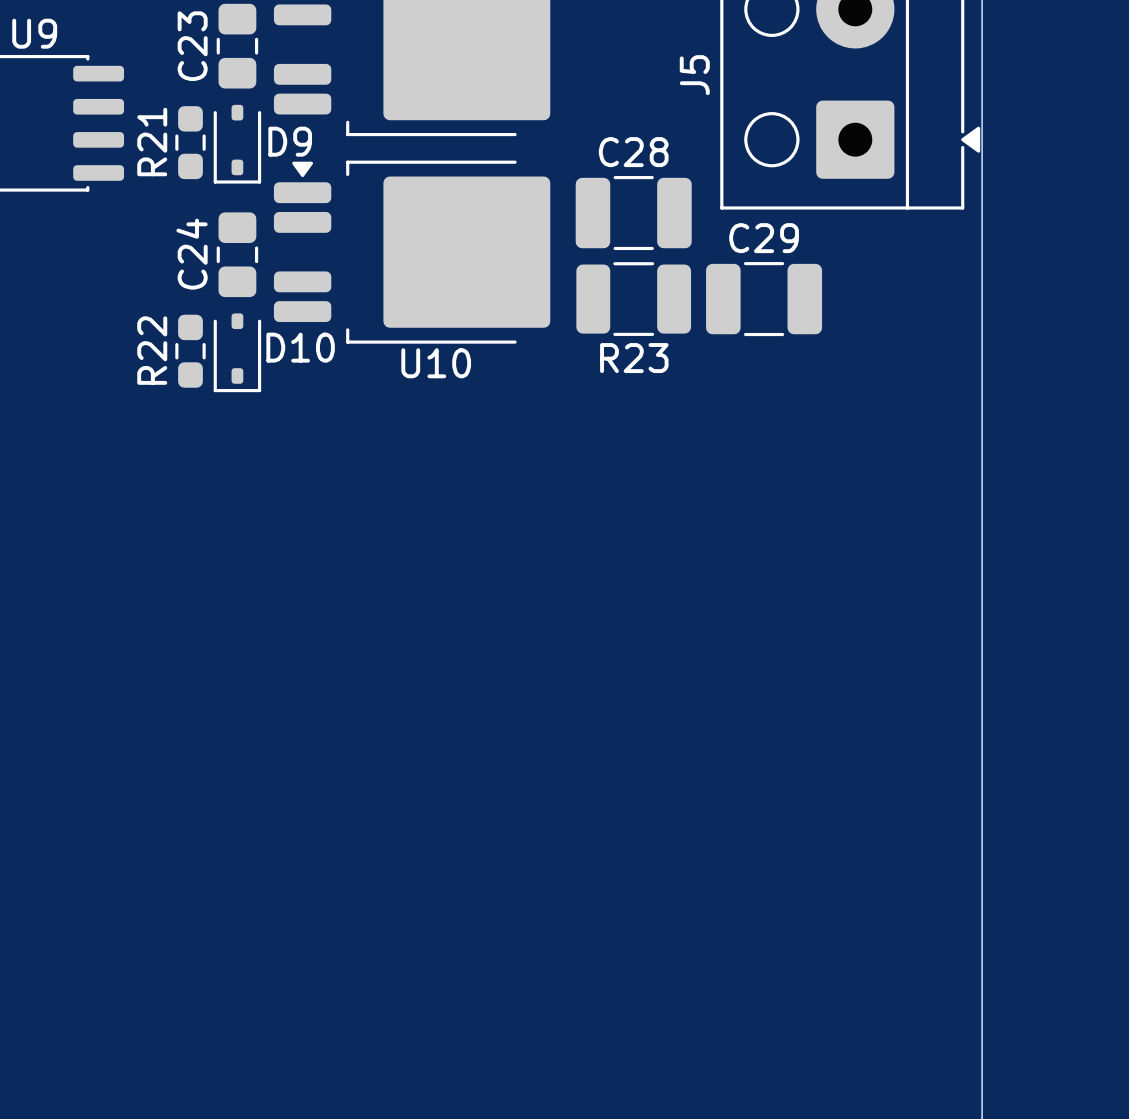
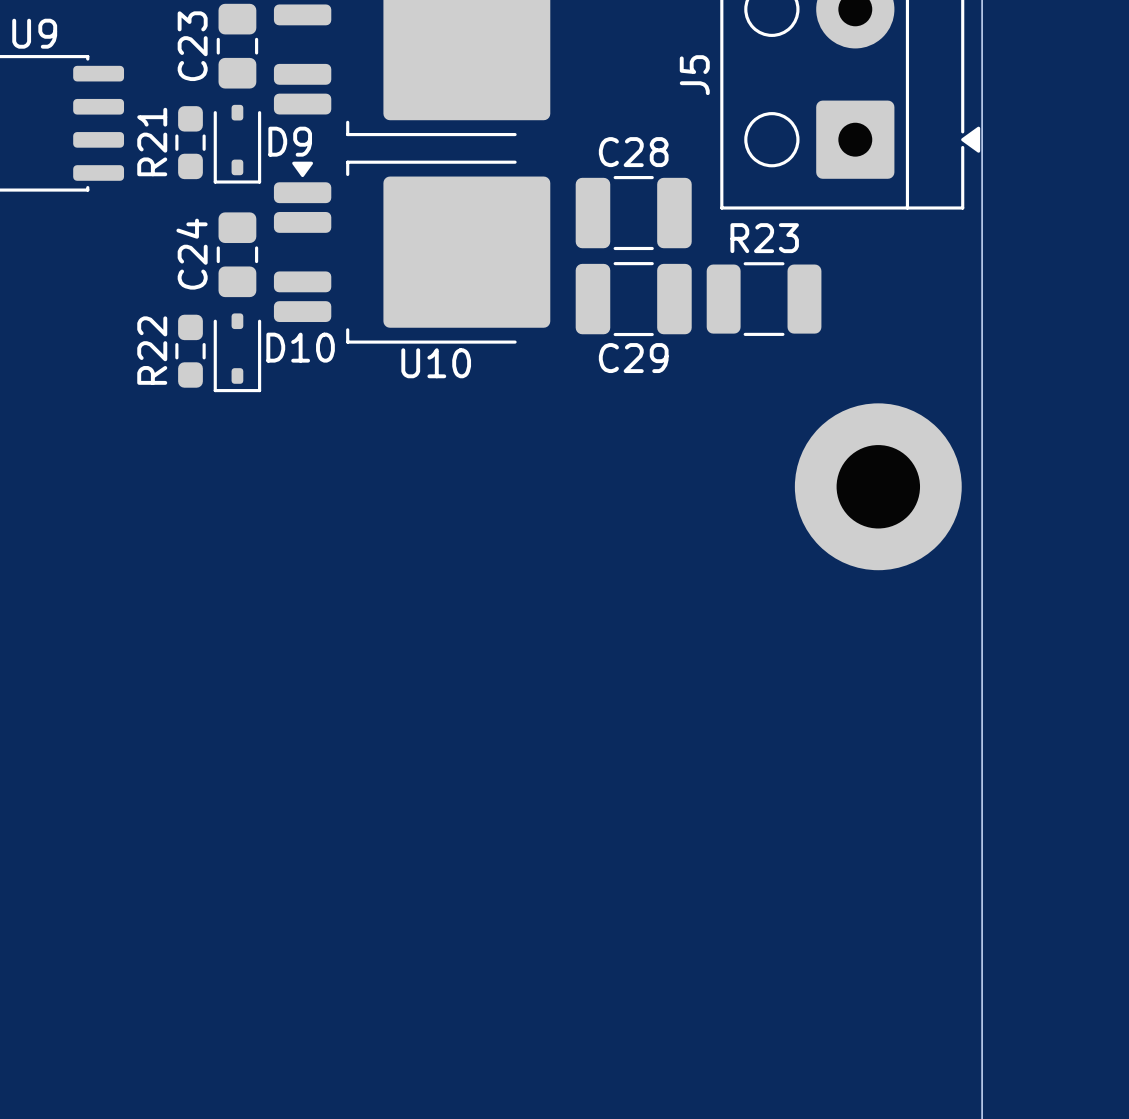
C29 name position: C29 (764, 238) -> C29 (633, 358)
R23 position: (633, 299) -> (764, 299)
C29 position: (764, 299) -> (633, 299)
R23 name position: R23 (634, 358) -> R23 (764, 238)
part: none -> (878, 486)

